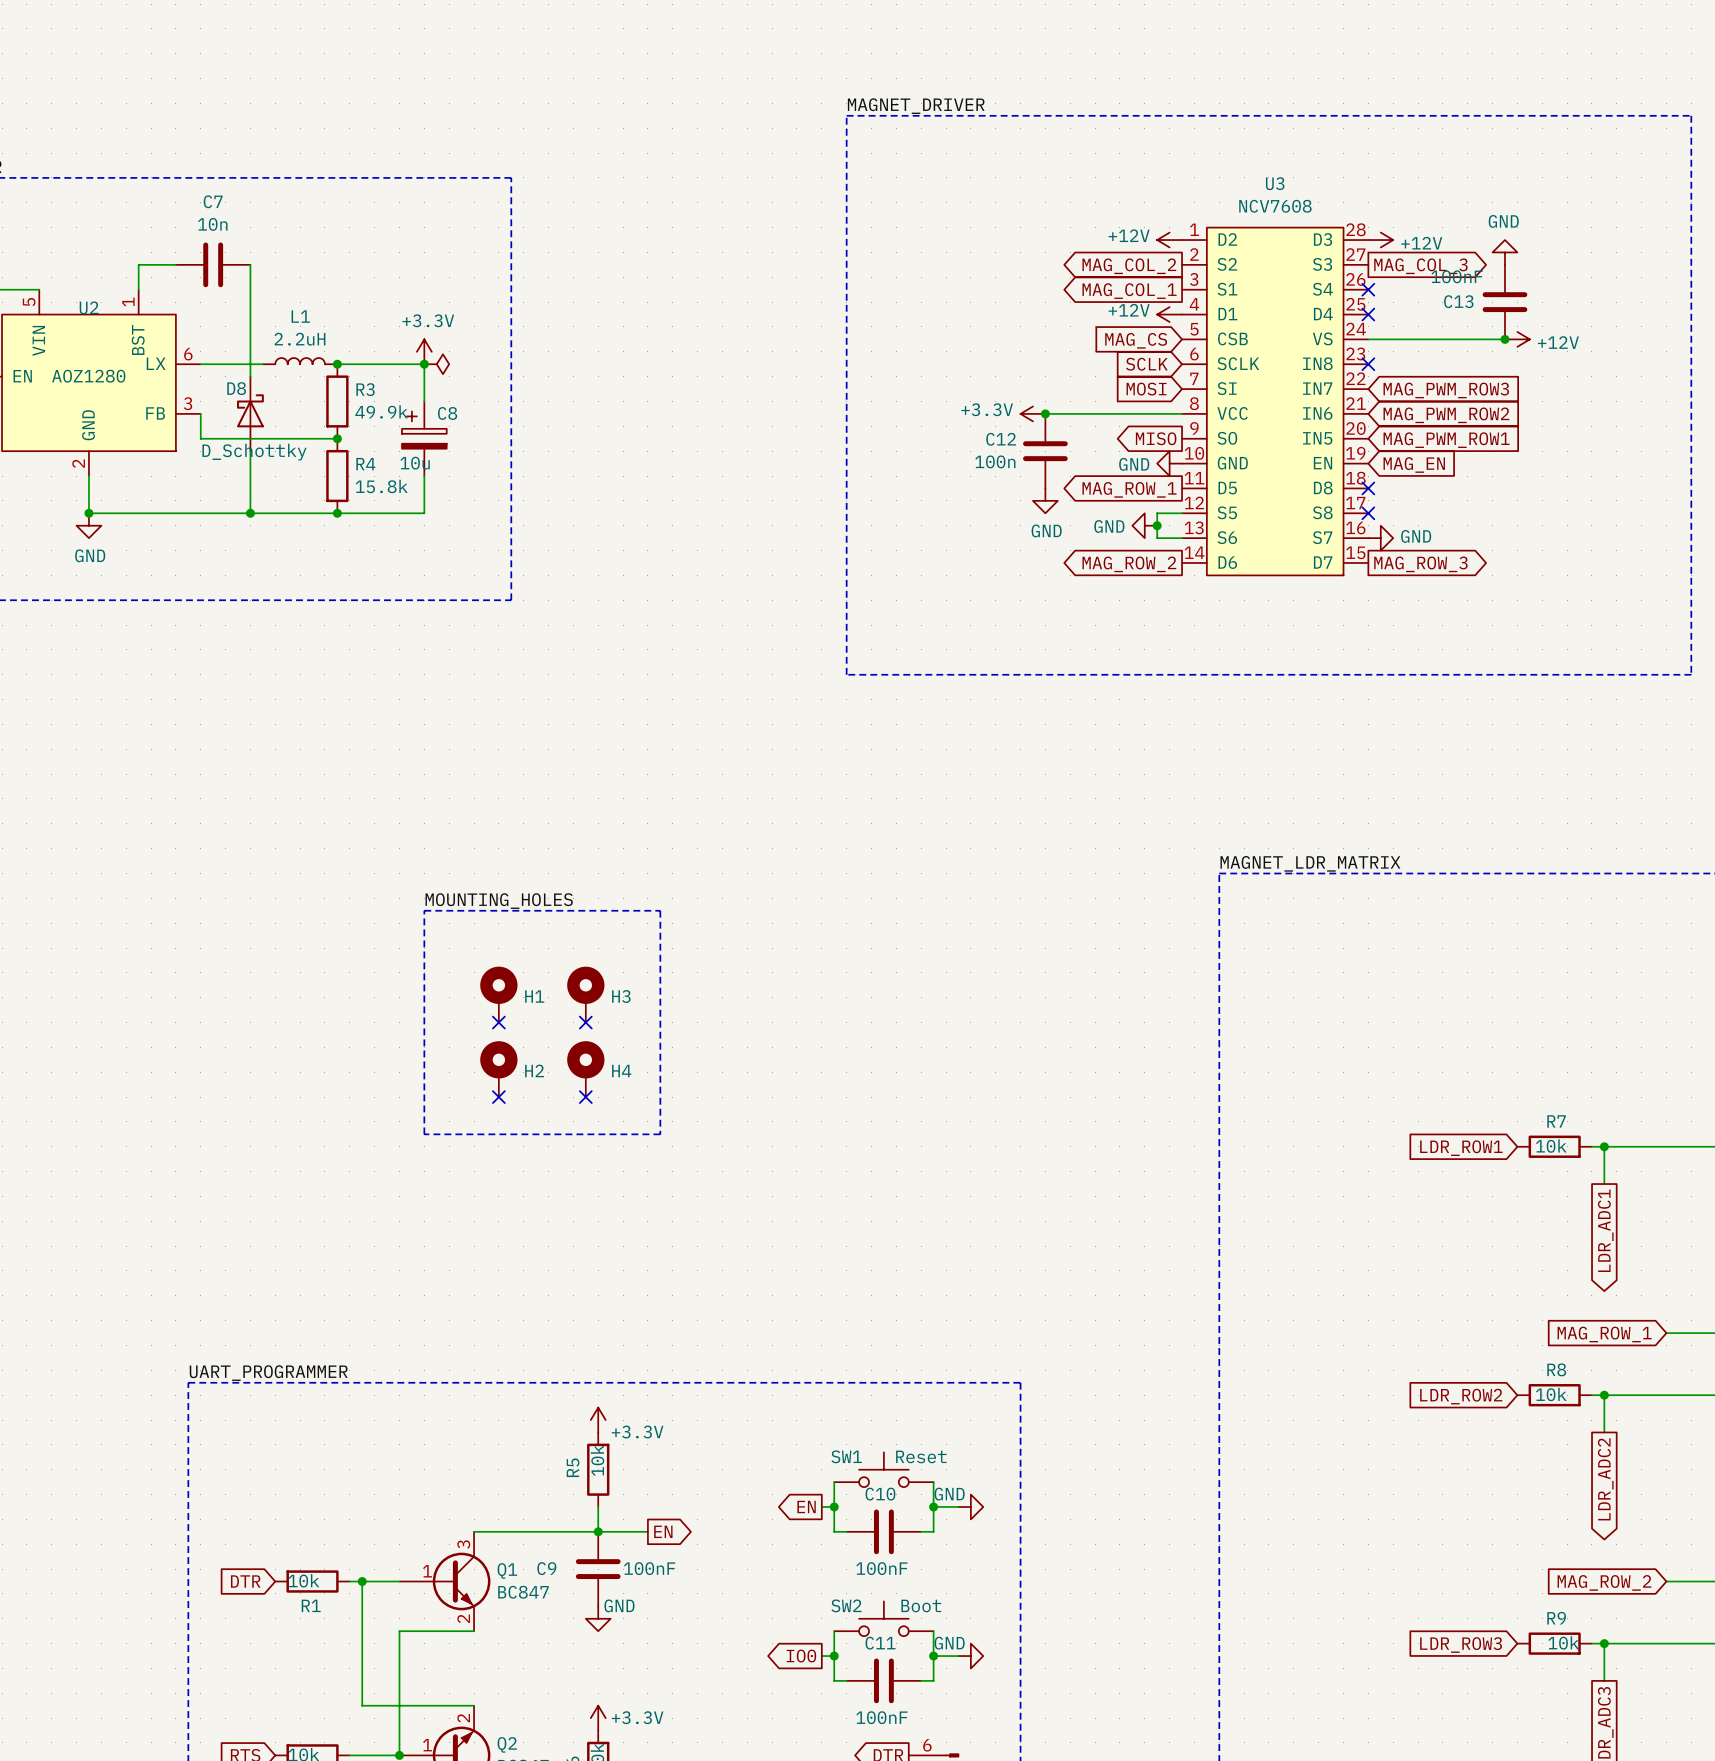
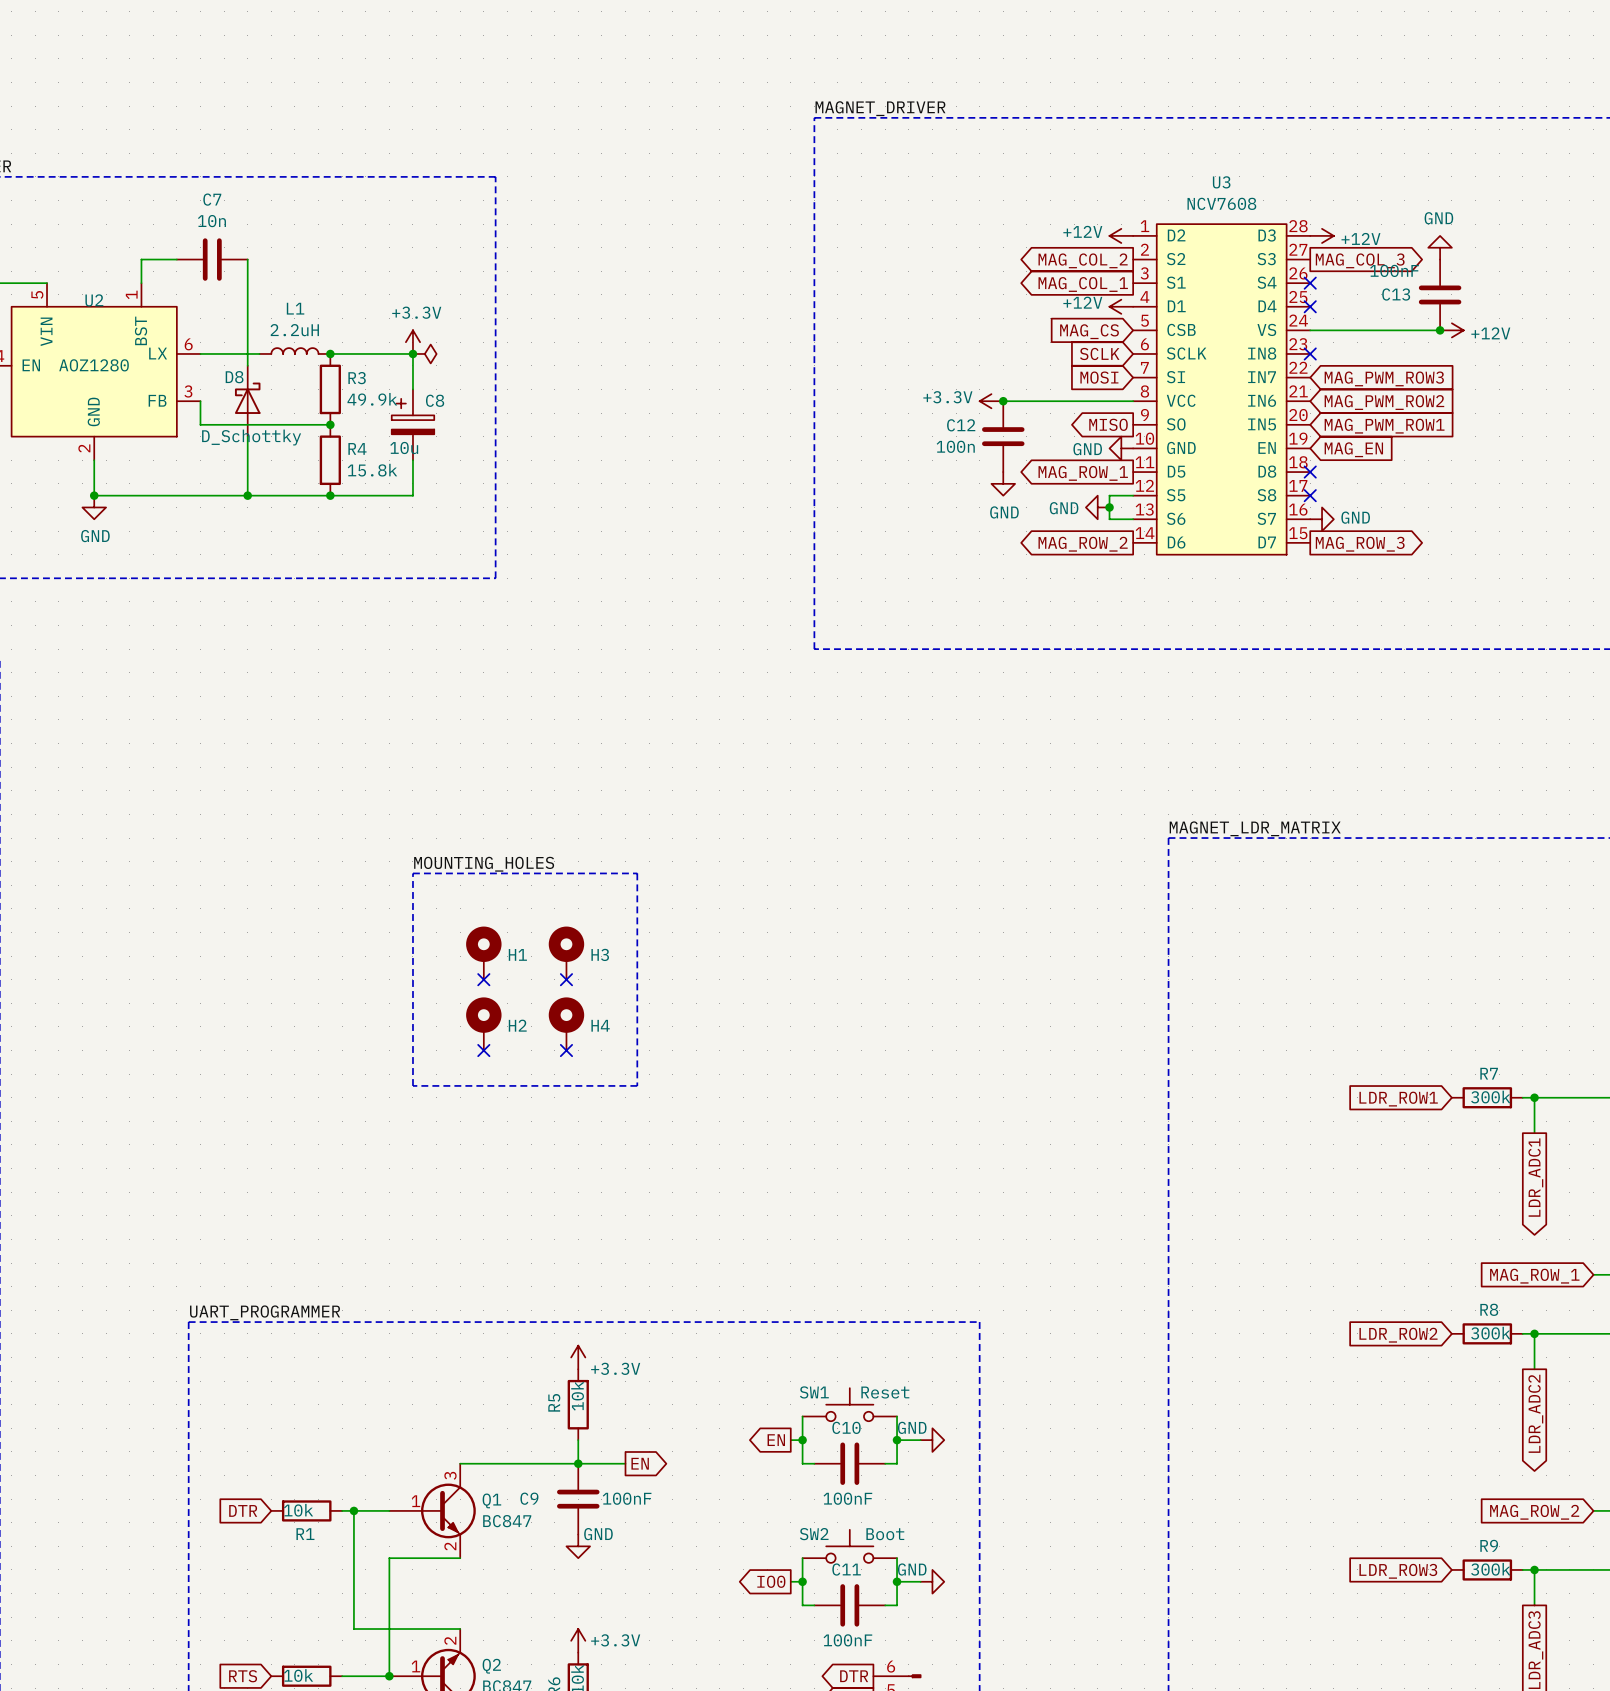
R7 value: 10k (1551, 1146) -> 300k (1490, 1097)
R8 value: 10k (1551, 1394) -> 300k (1490, 1333)
R9 value: 10k (1563, 1642) -> 300k (1490, 1569)

